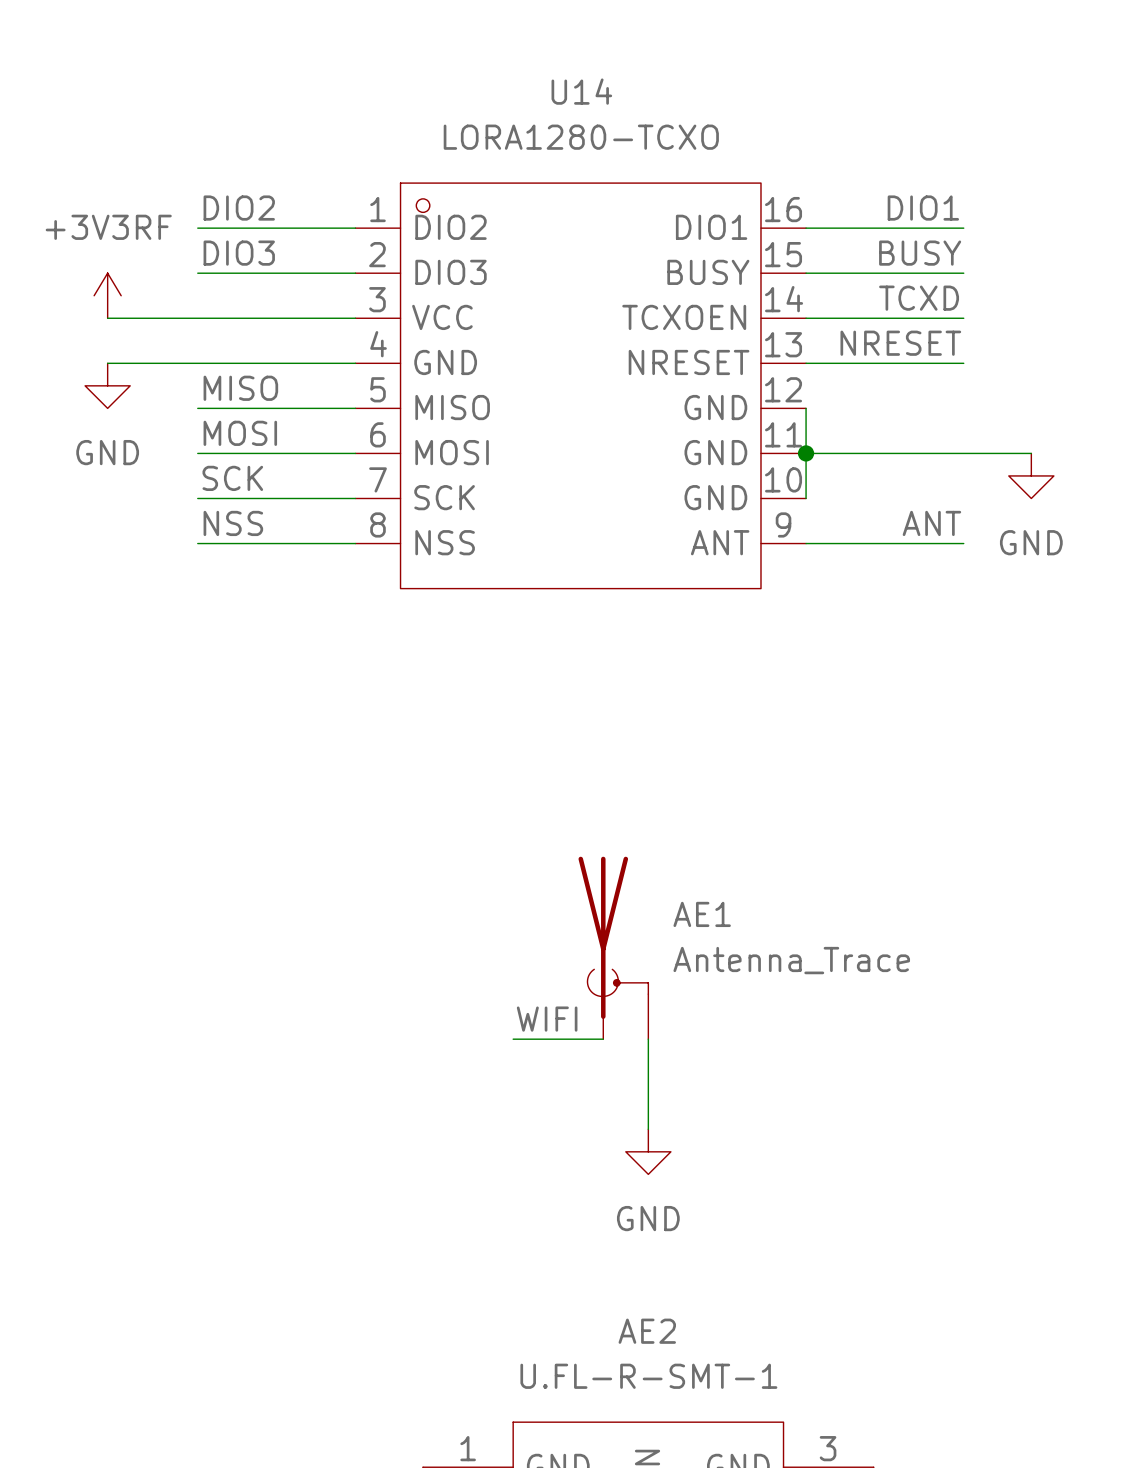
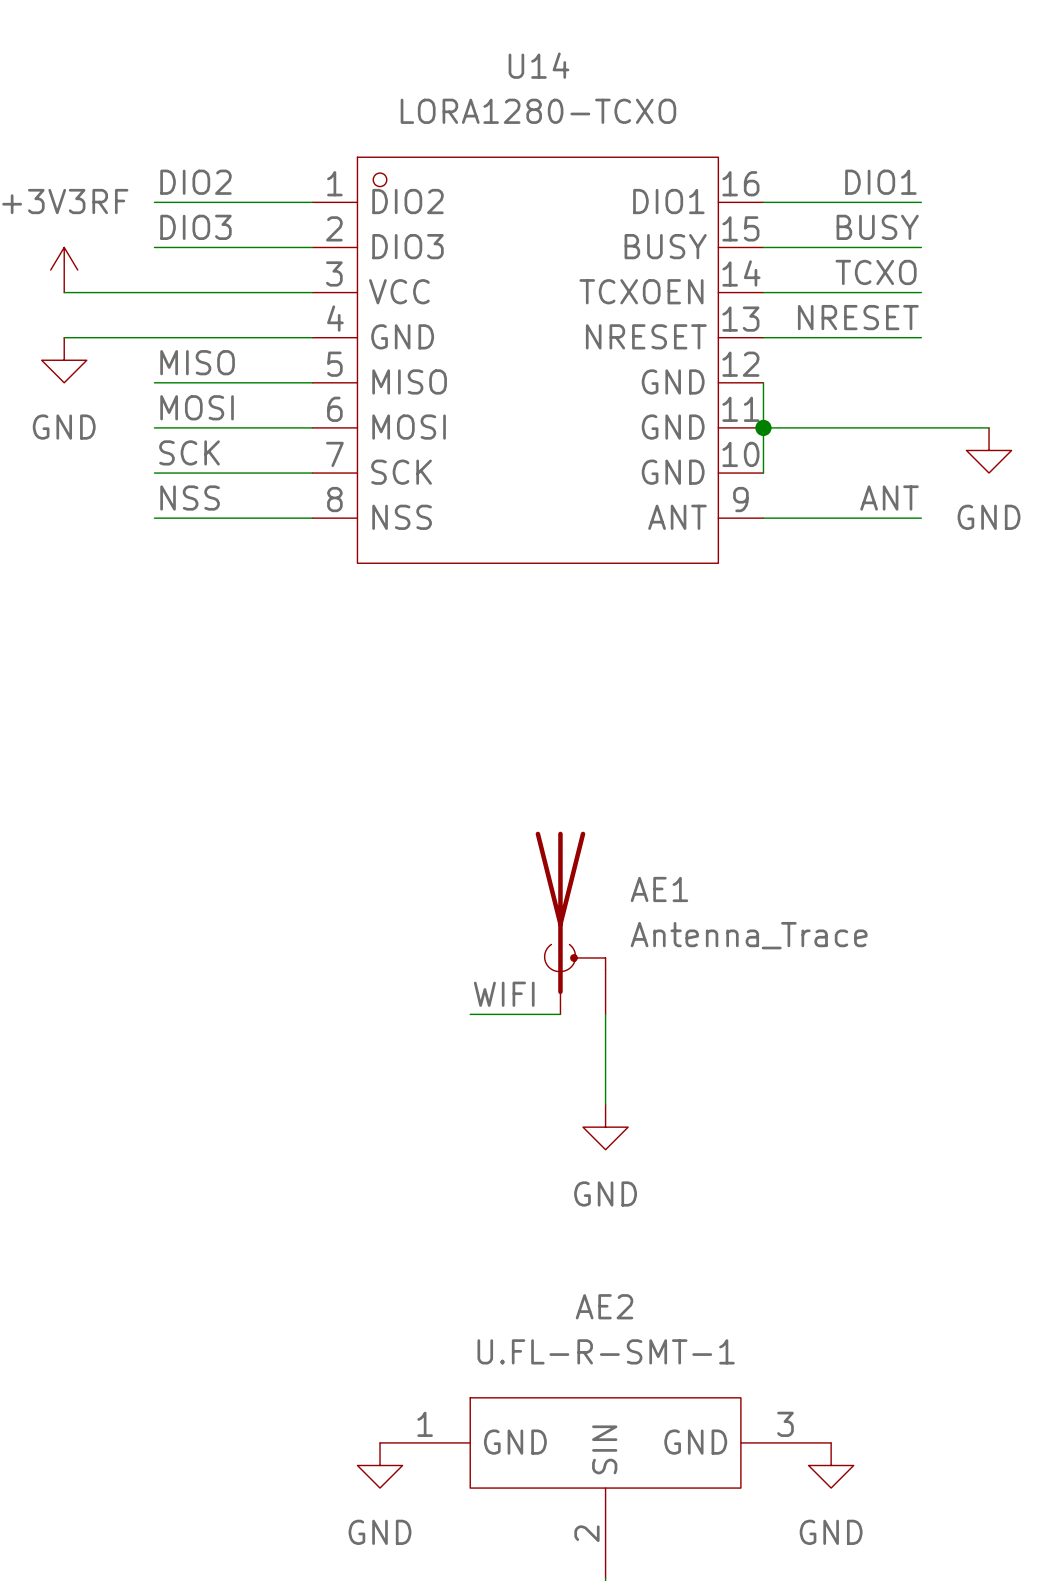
label: TCXD (919, 298) -> TCXO (876, 272)

